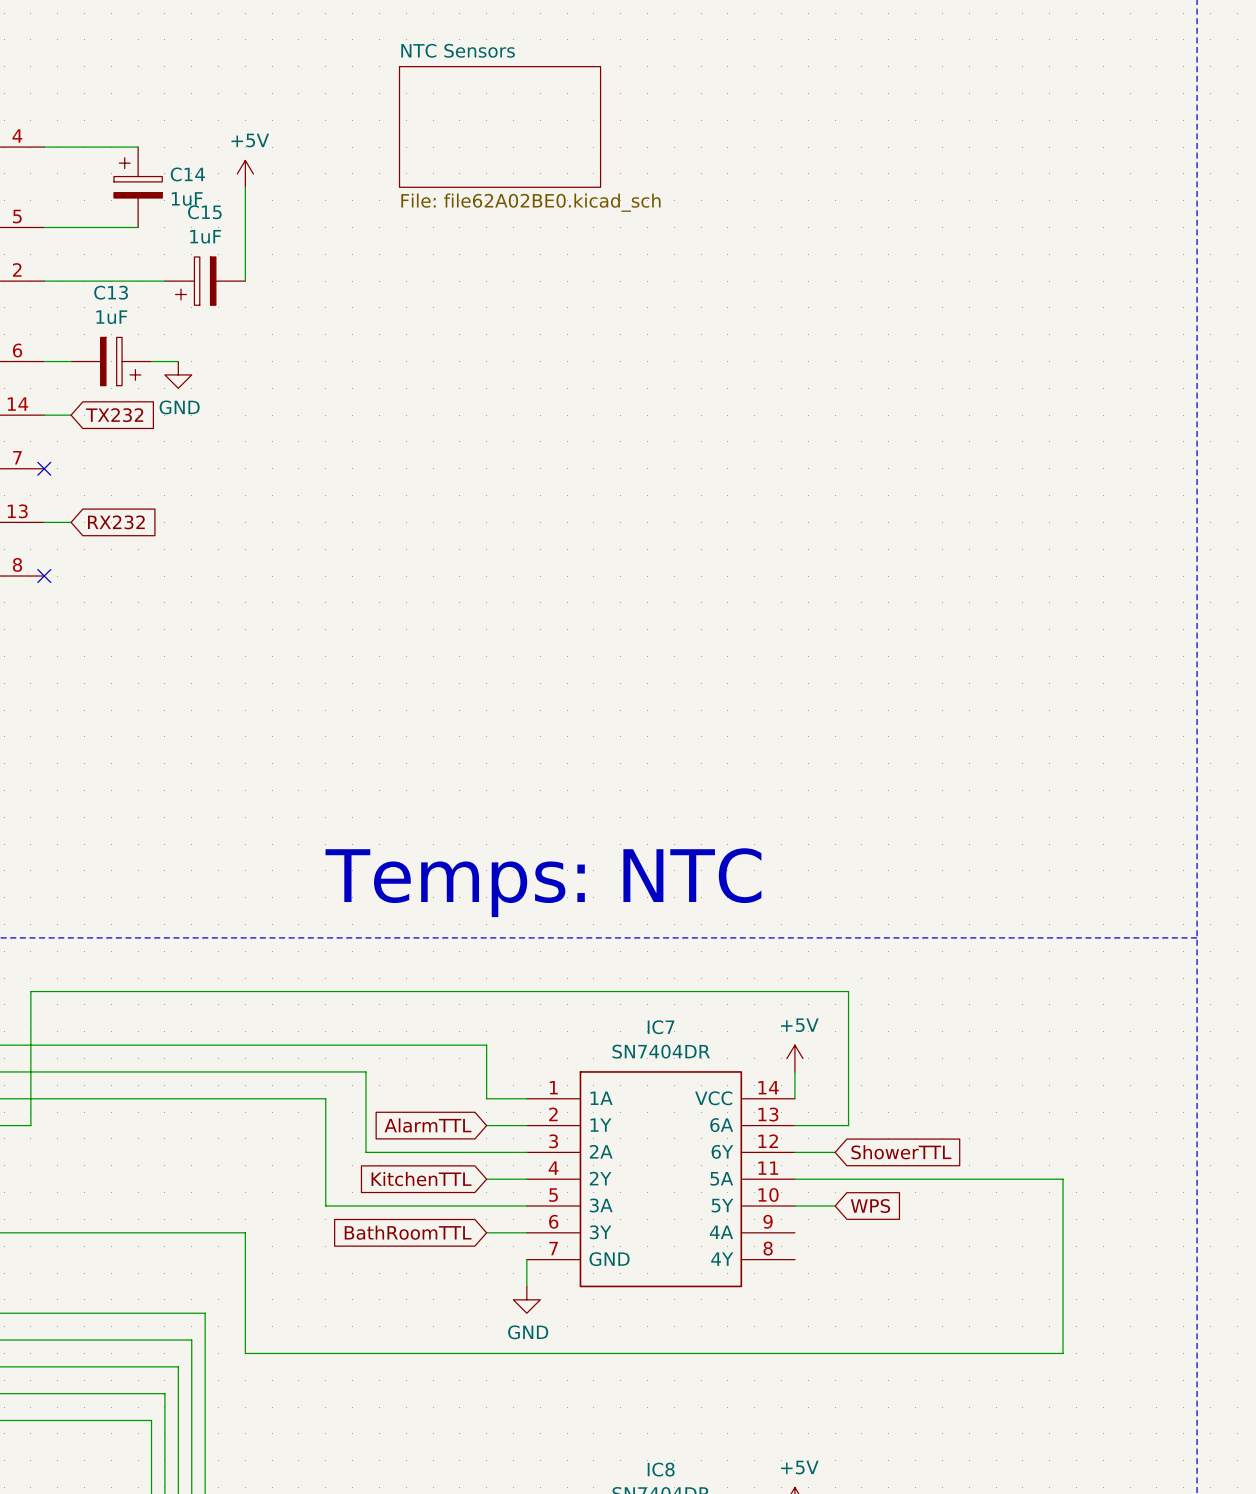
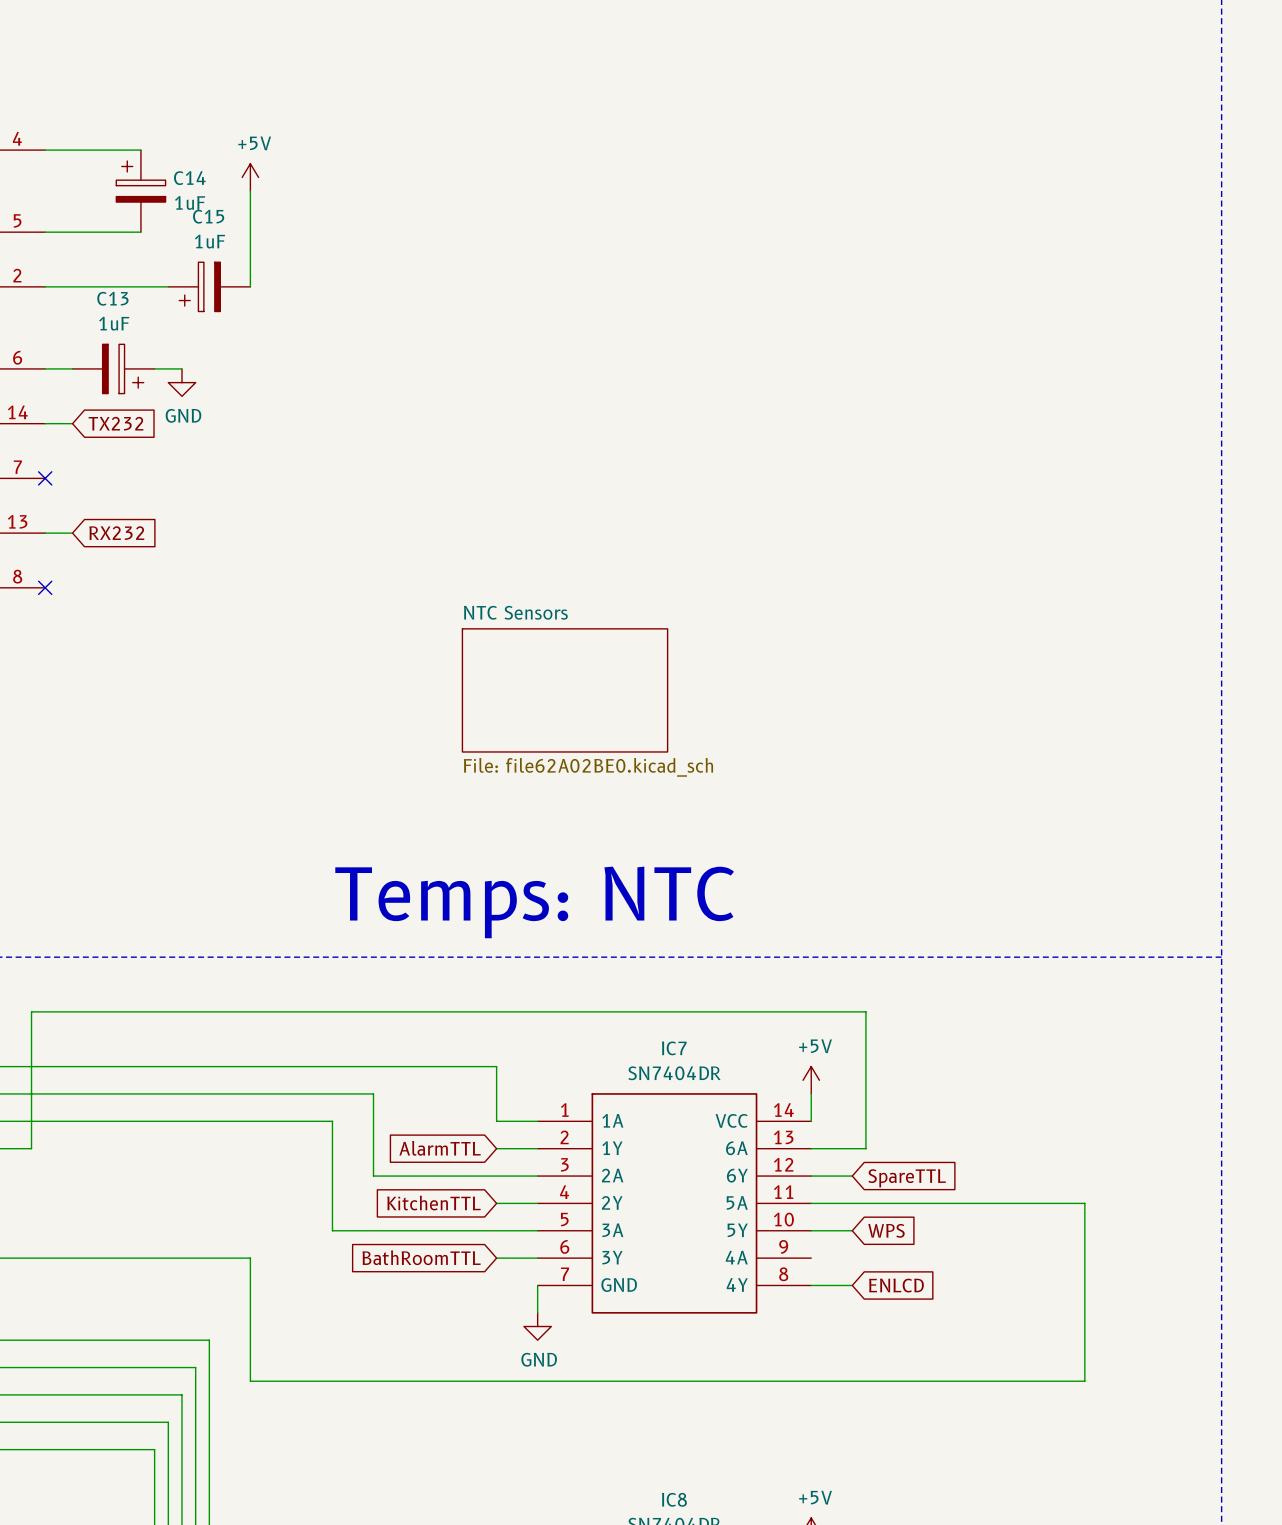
sheet NTC Sensors: File: file62A02BE0.kicad_sch (500, 126) -> none
sheet NTC Sensors: none -> File: file62A02BE0.kicad_sch (565, 690)
global label: ShowerTTL (901, 1152) -> SpareTTL (907, 1178)
wire: none -> (811, 1285) (852, 1285)
global label: none -> ENLCD (896, 1285)

